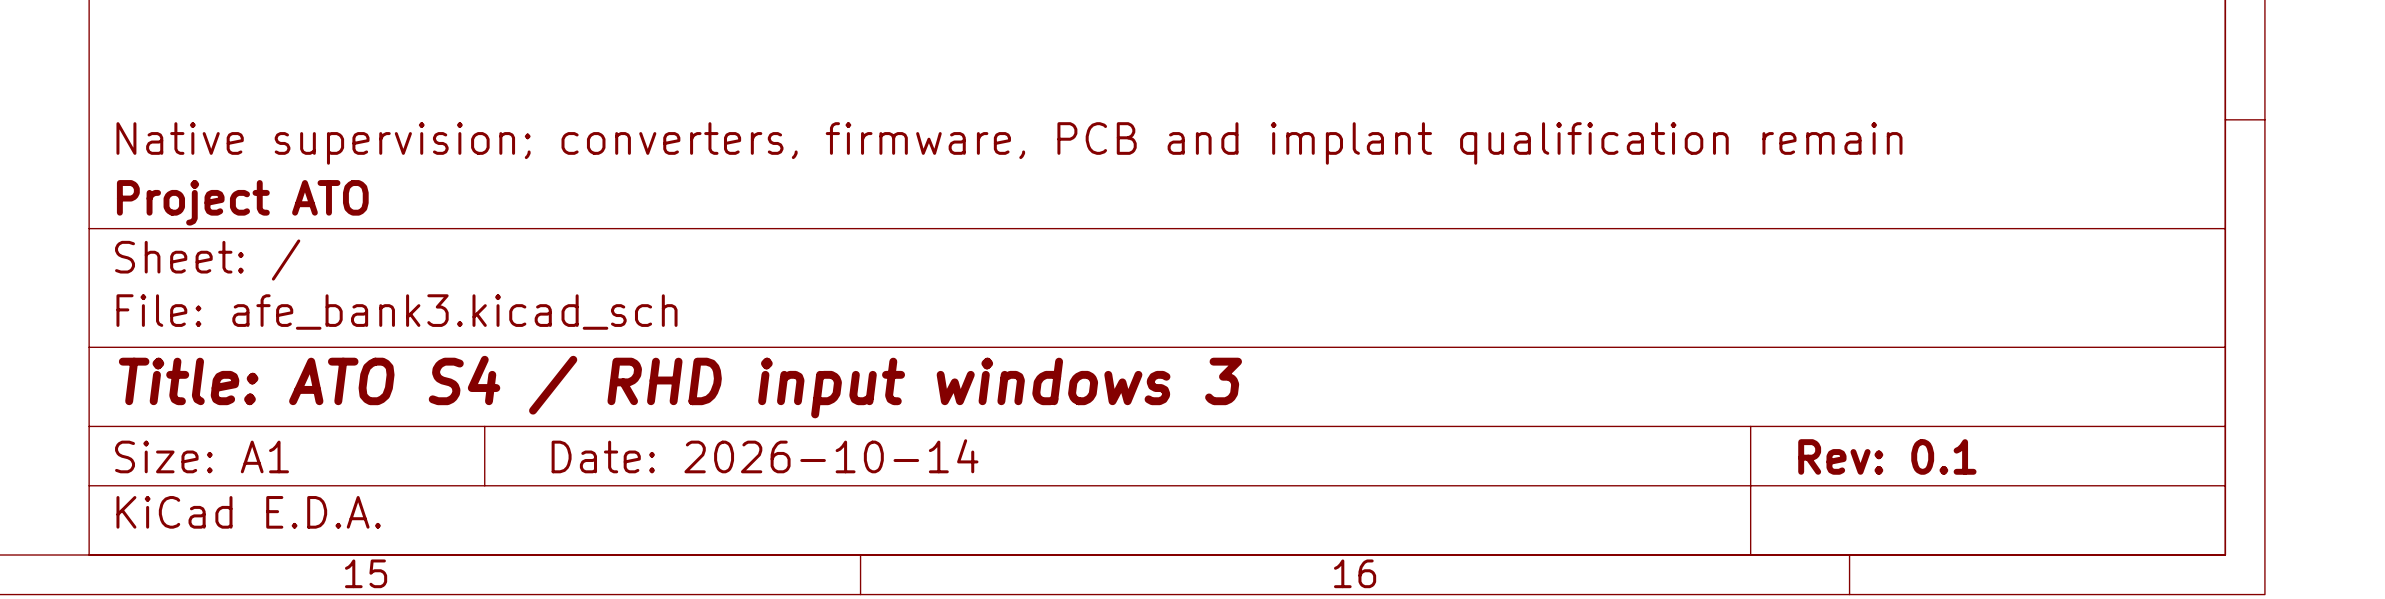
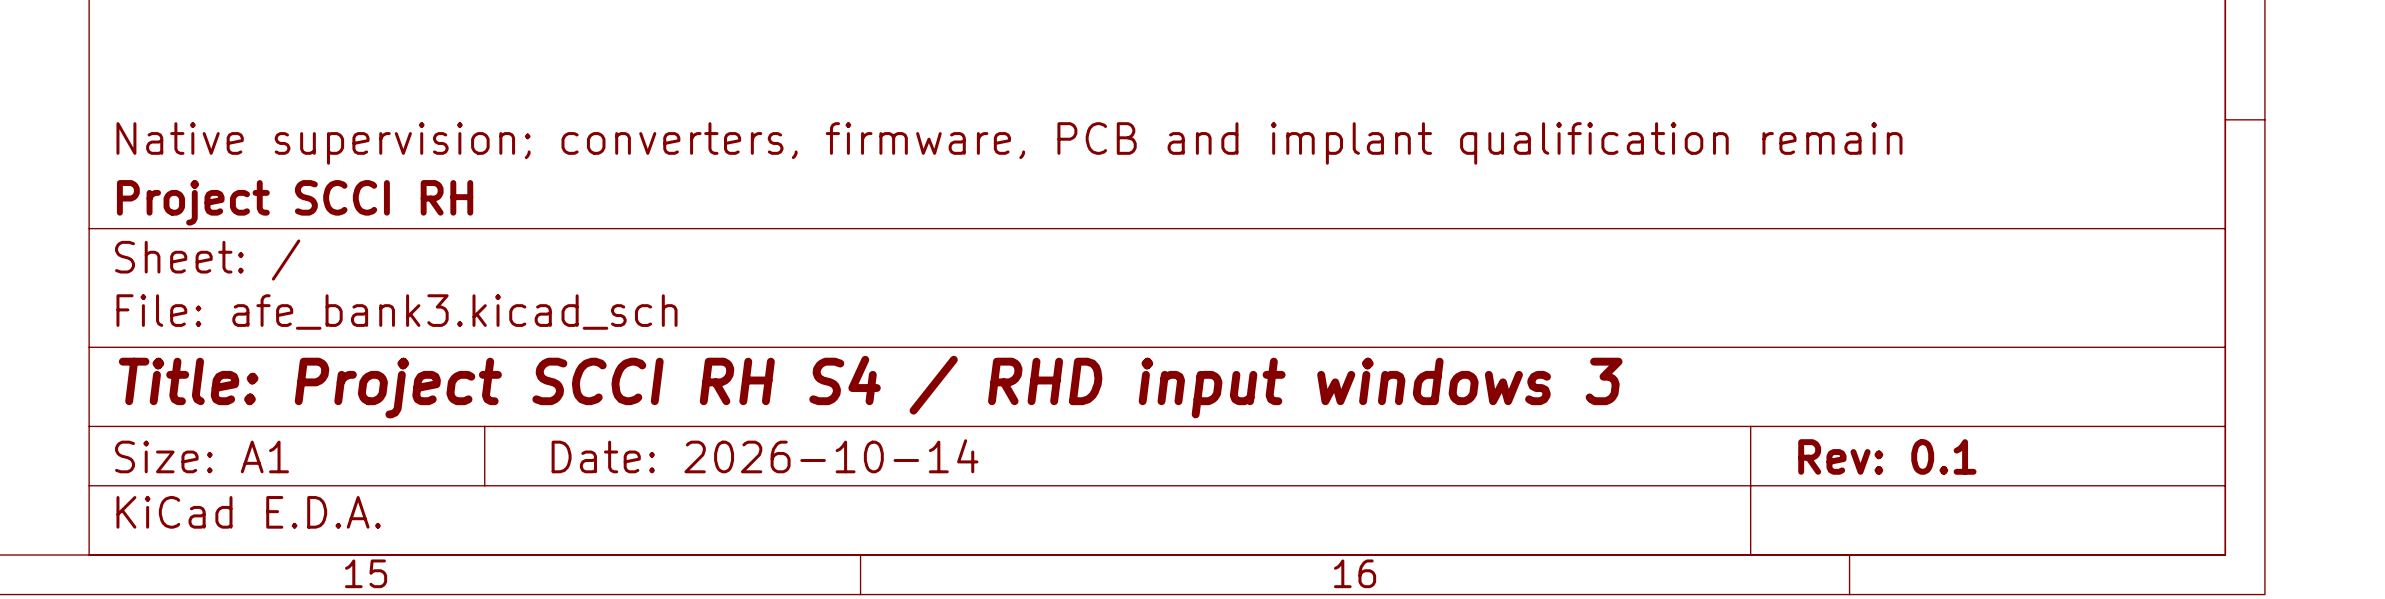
title block: Project ATO (242, 202) -> Project SCCI RH (295, 202)
title block: Title: ATO S4 / RHD input windows 3 (680, 387) -> Title: Project SCCI RH S4 / RHD input windows 3 (870, 387)

